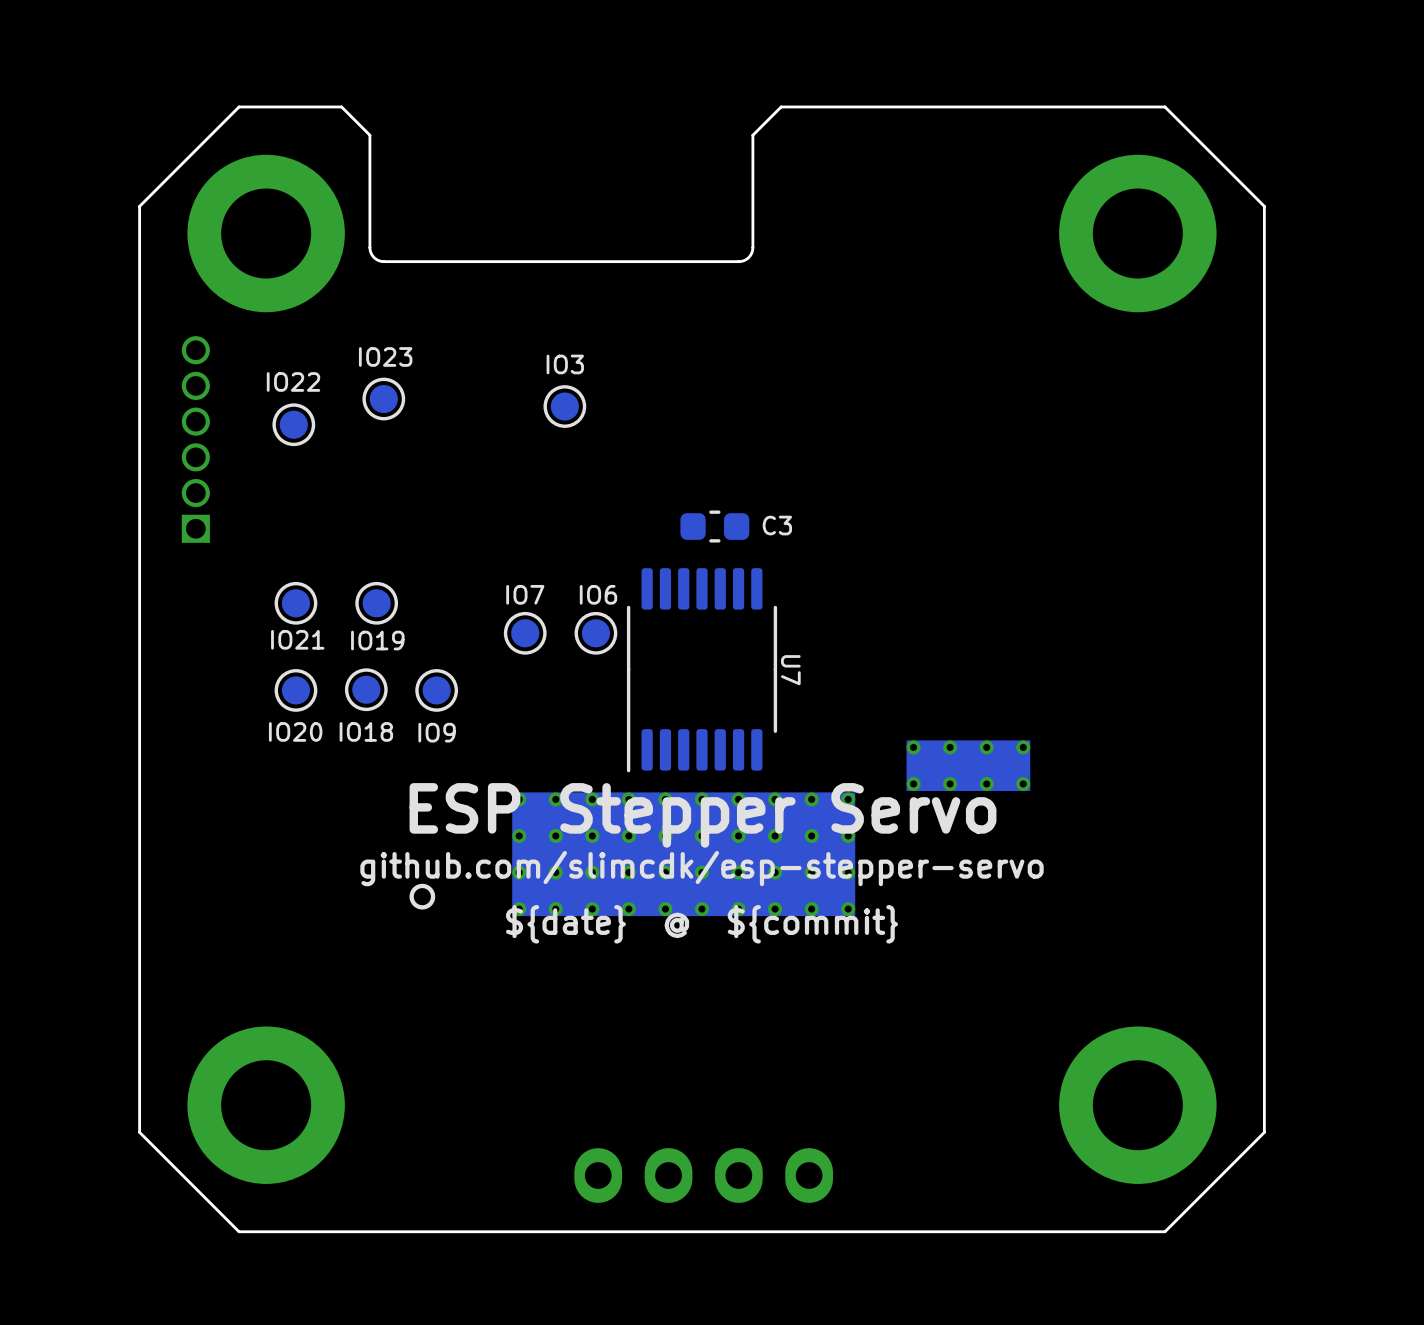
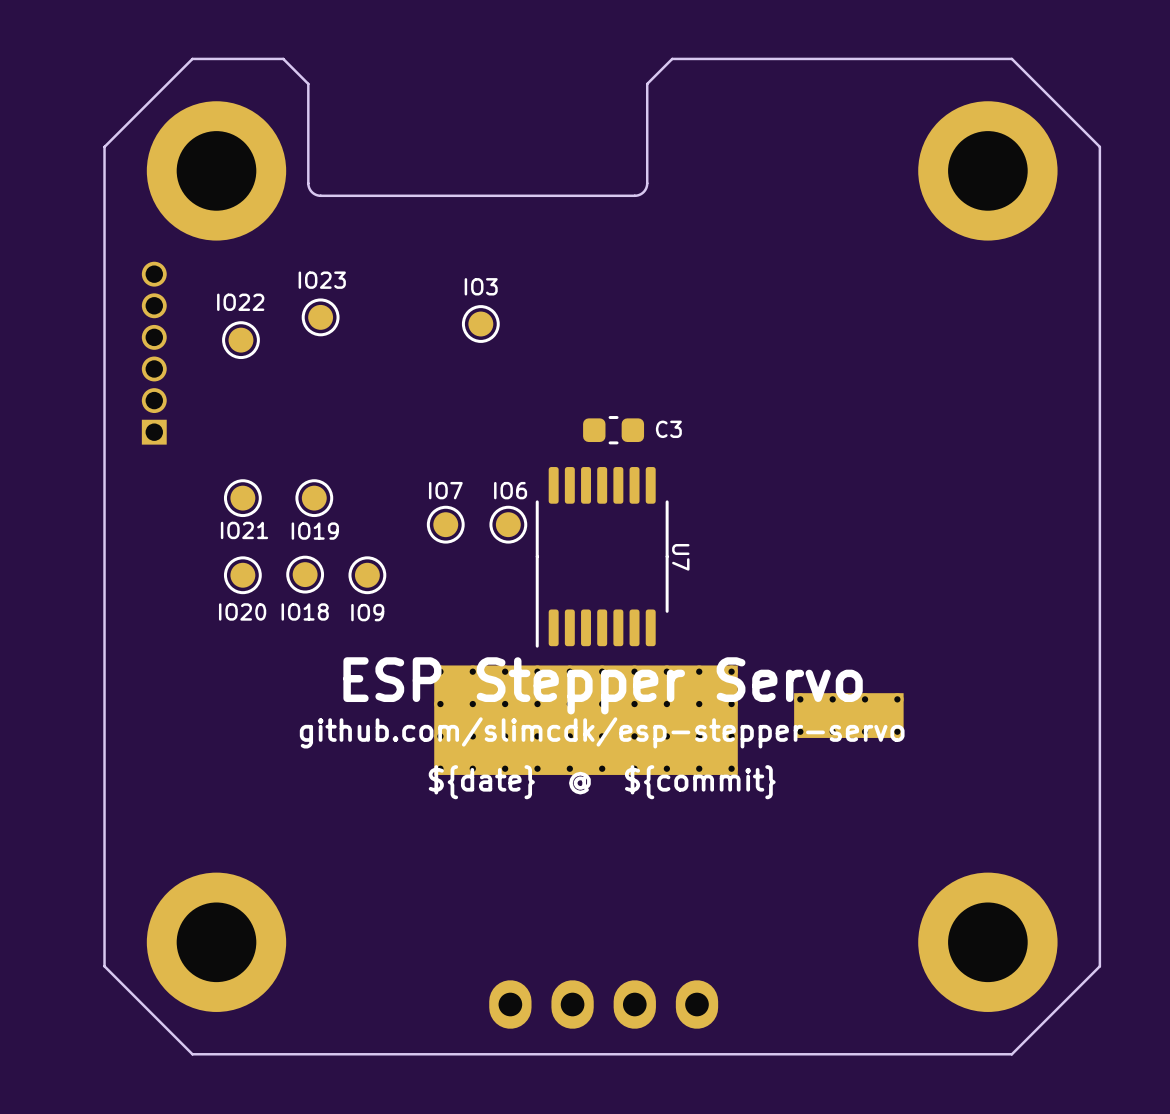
part position: (968, 765) -> (848, 715)
part: (422, 896) -> none

